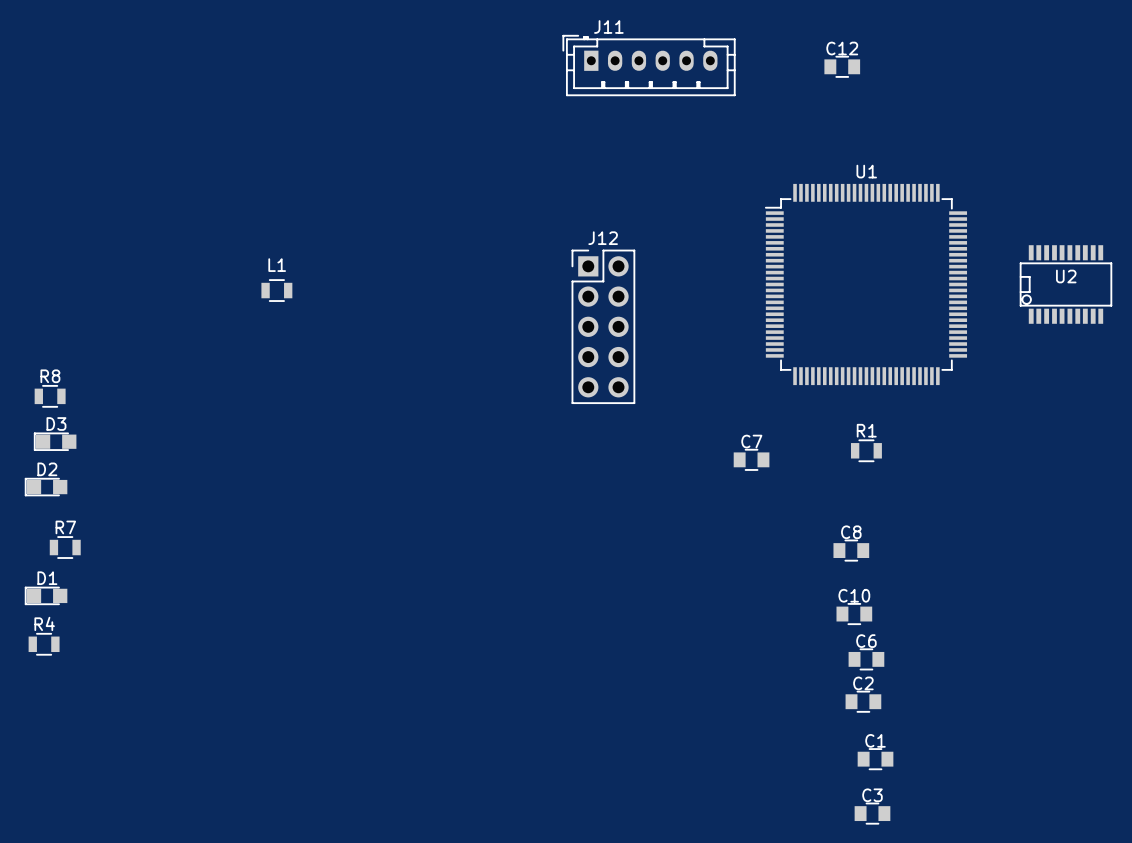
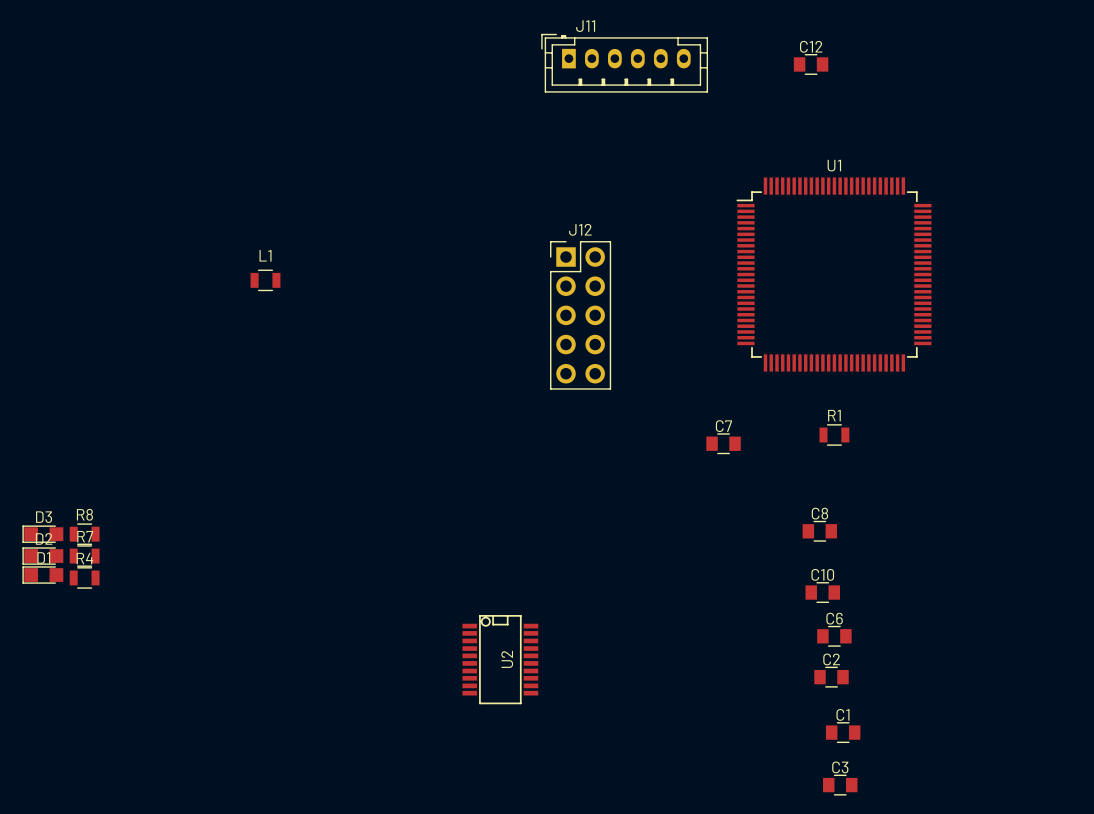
U2 rotation: 0° (1065, 284) -> 90° clockwise (500, 659)
U2 position: (1065, 284) -> (500, 659)
R8 position: (50, 396) -> (84, 534)
D3 position: (55, 441) -> (42, 534)
D2 position: (46, 487) -> (42, 556)
R7 position: (65, 547) -> (84, 556)
R4 position: (44, 644) -> (84, 577)

